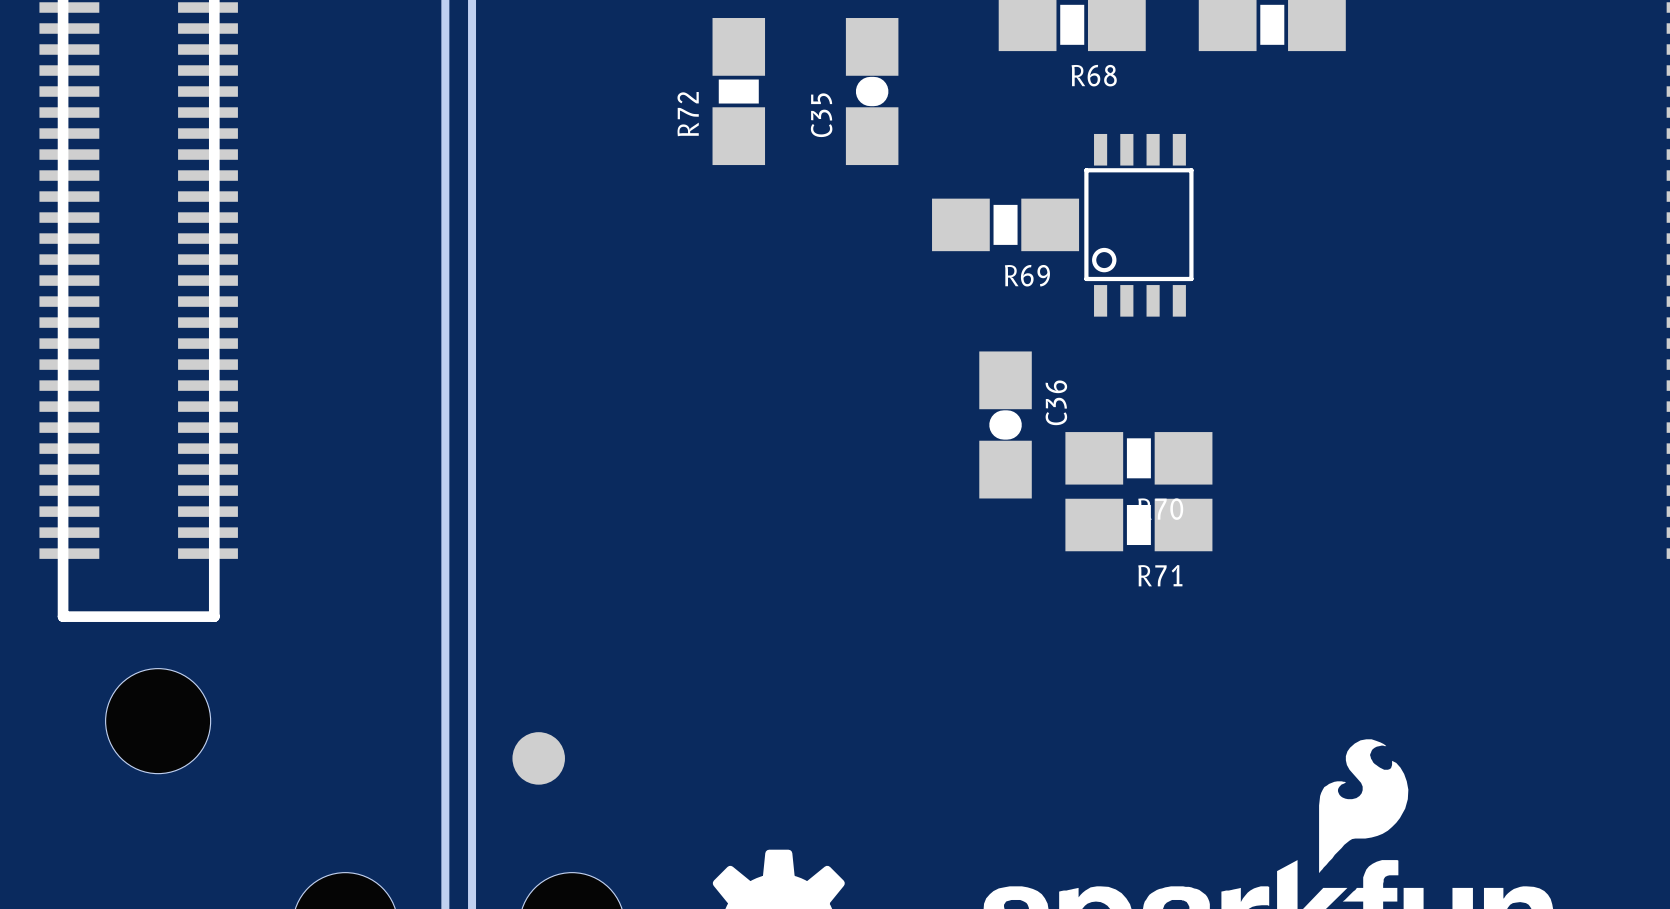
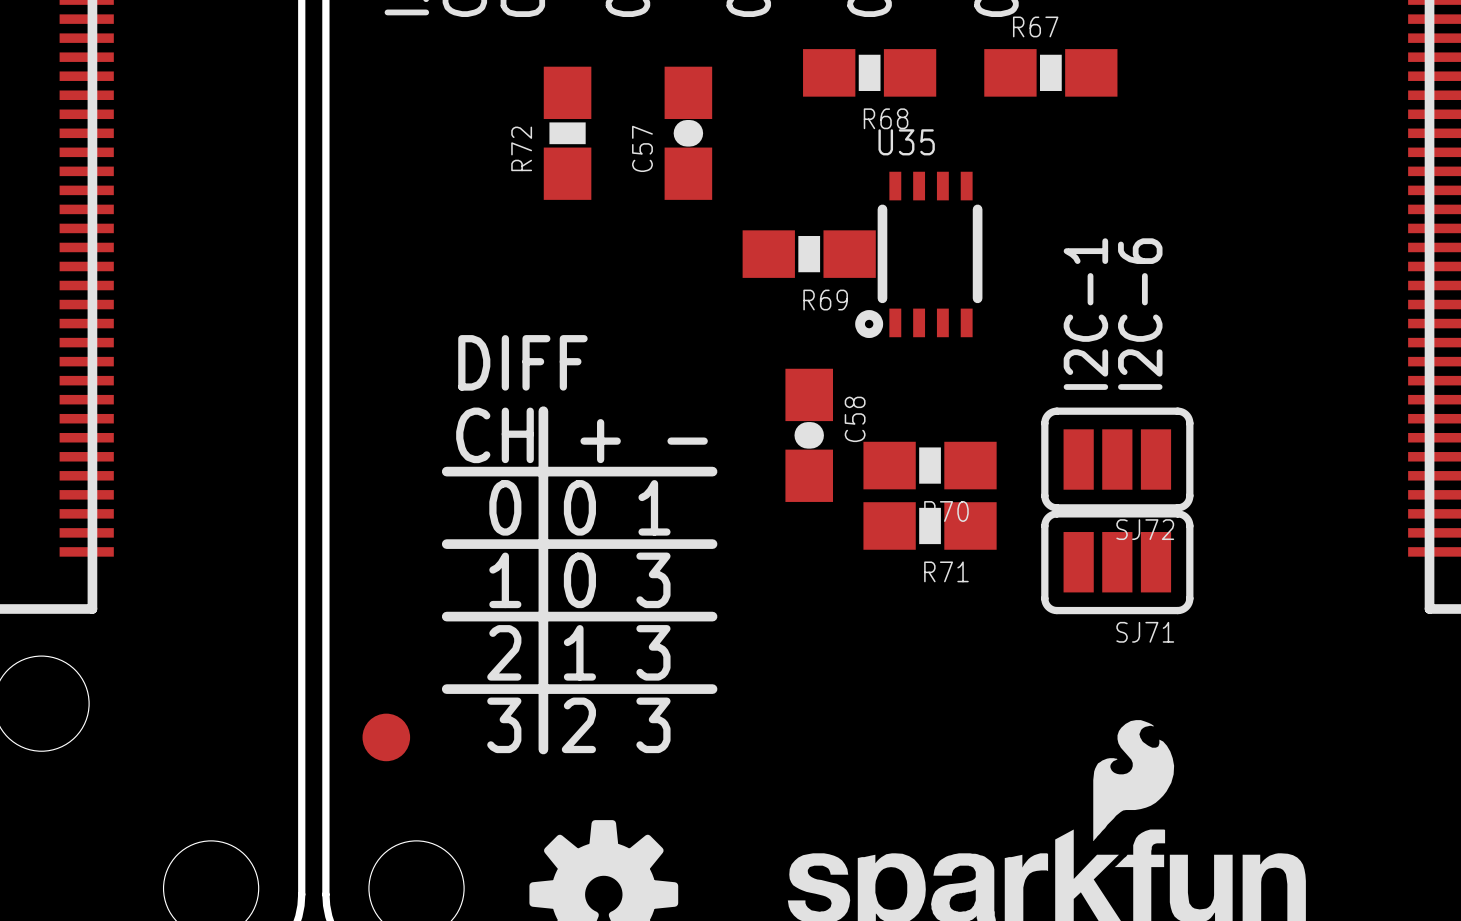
C35 name: C35 (821, 115) -> C57 (642, 148)
U35: none -> (918, 254)
part: (1138, 225) -> none
text: none -> I2C-6 (1140, 314)
text: none -> I2C-1 (1085, 314)
text: none -> DIFF (522, 362)
line: none -> (543, 411) (543, 749)
C36 name: C36 (1056, 402) -> C58 (855, 419)
text: none -> CH + - (581, 435)
SJ72: none -> (1117, 459)
line: none -> (446, 471) (712, 471)
text: none -> 0 0 1 (579, 507)
line: none -> (446, 544) (712, 544)
SJ71: none -> (1117, 562)
text: none -> 1 0 3 (579, 580)
line: none -> (446, 616) (712, 616)
text: none -> 2 1 3 (578, 652)
line: none -> (446, 689) (712, 689)
text: none -> 3 2 3 (578, 725)

